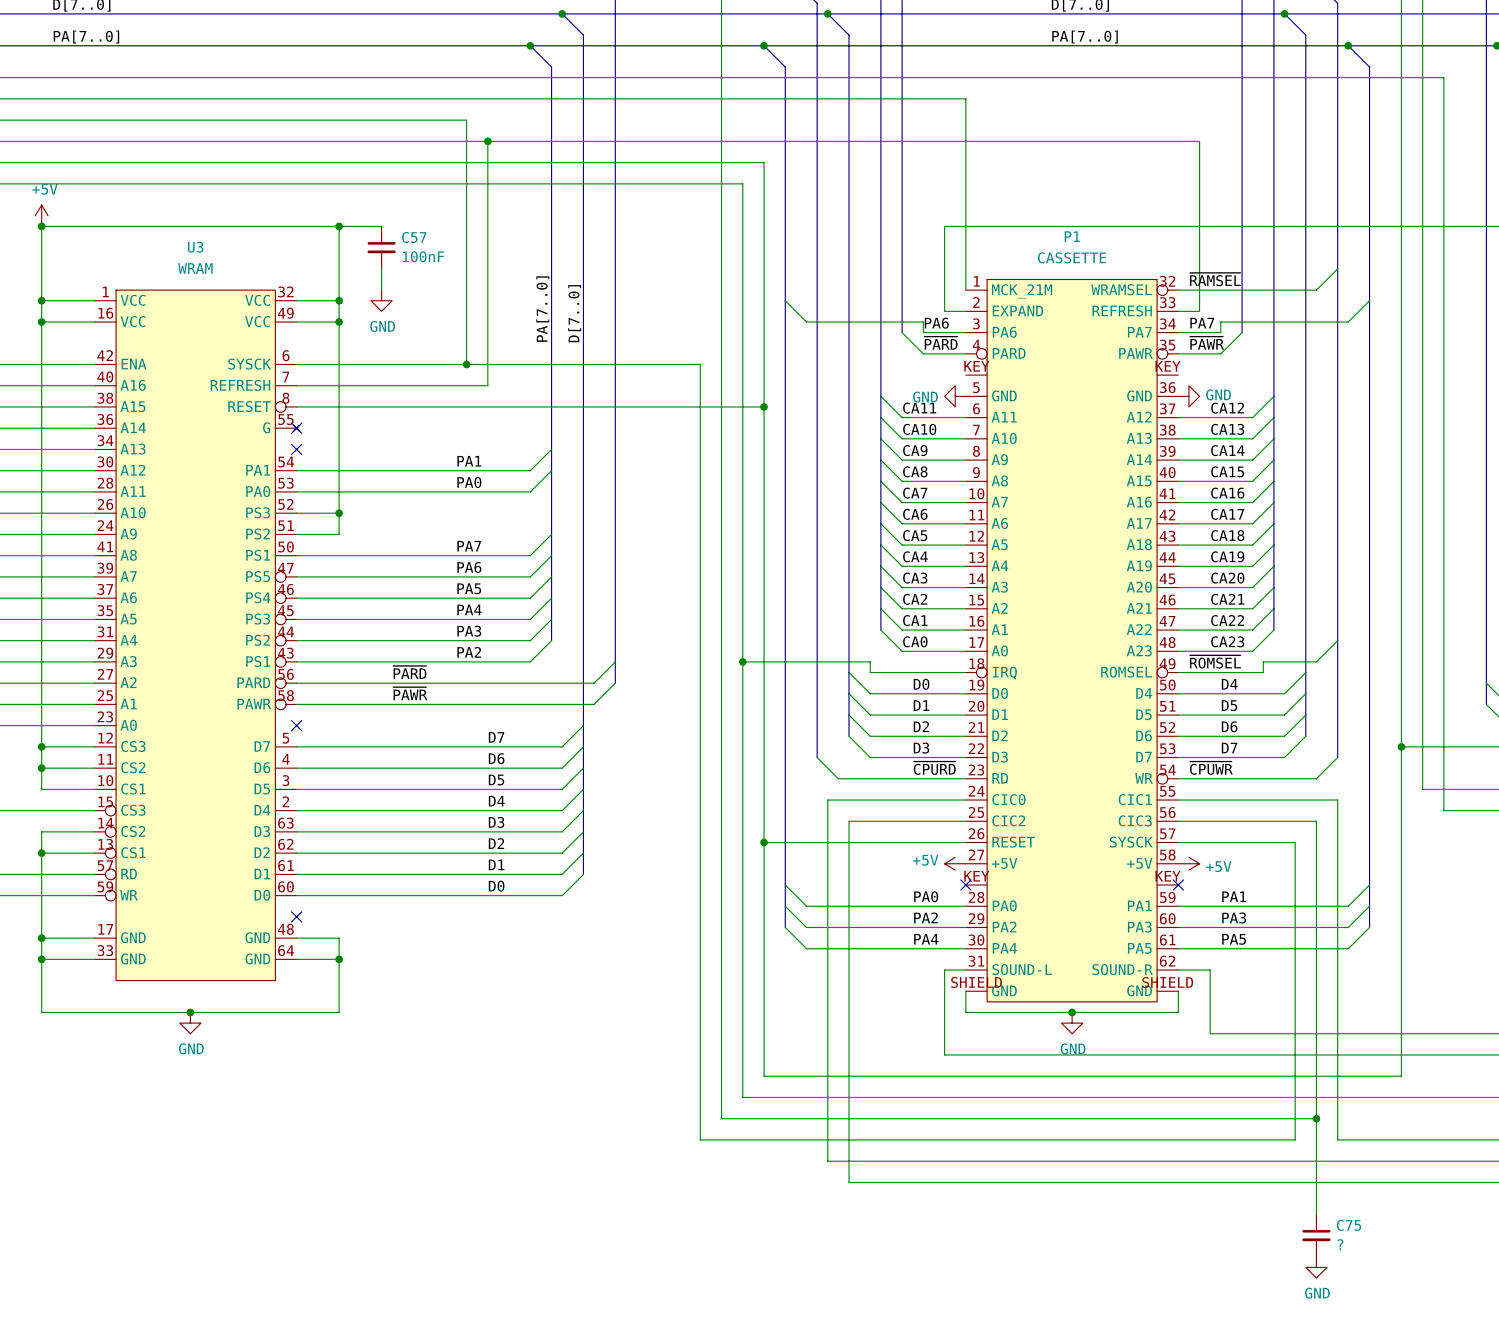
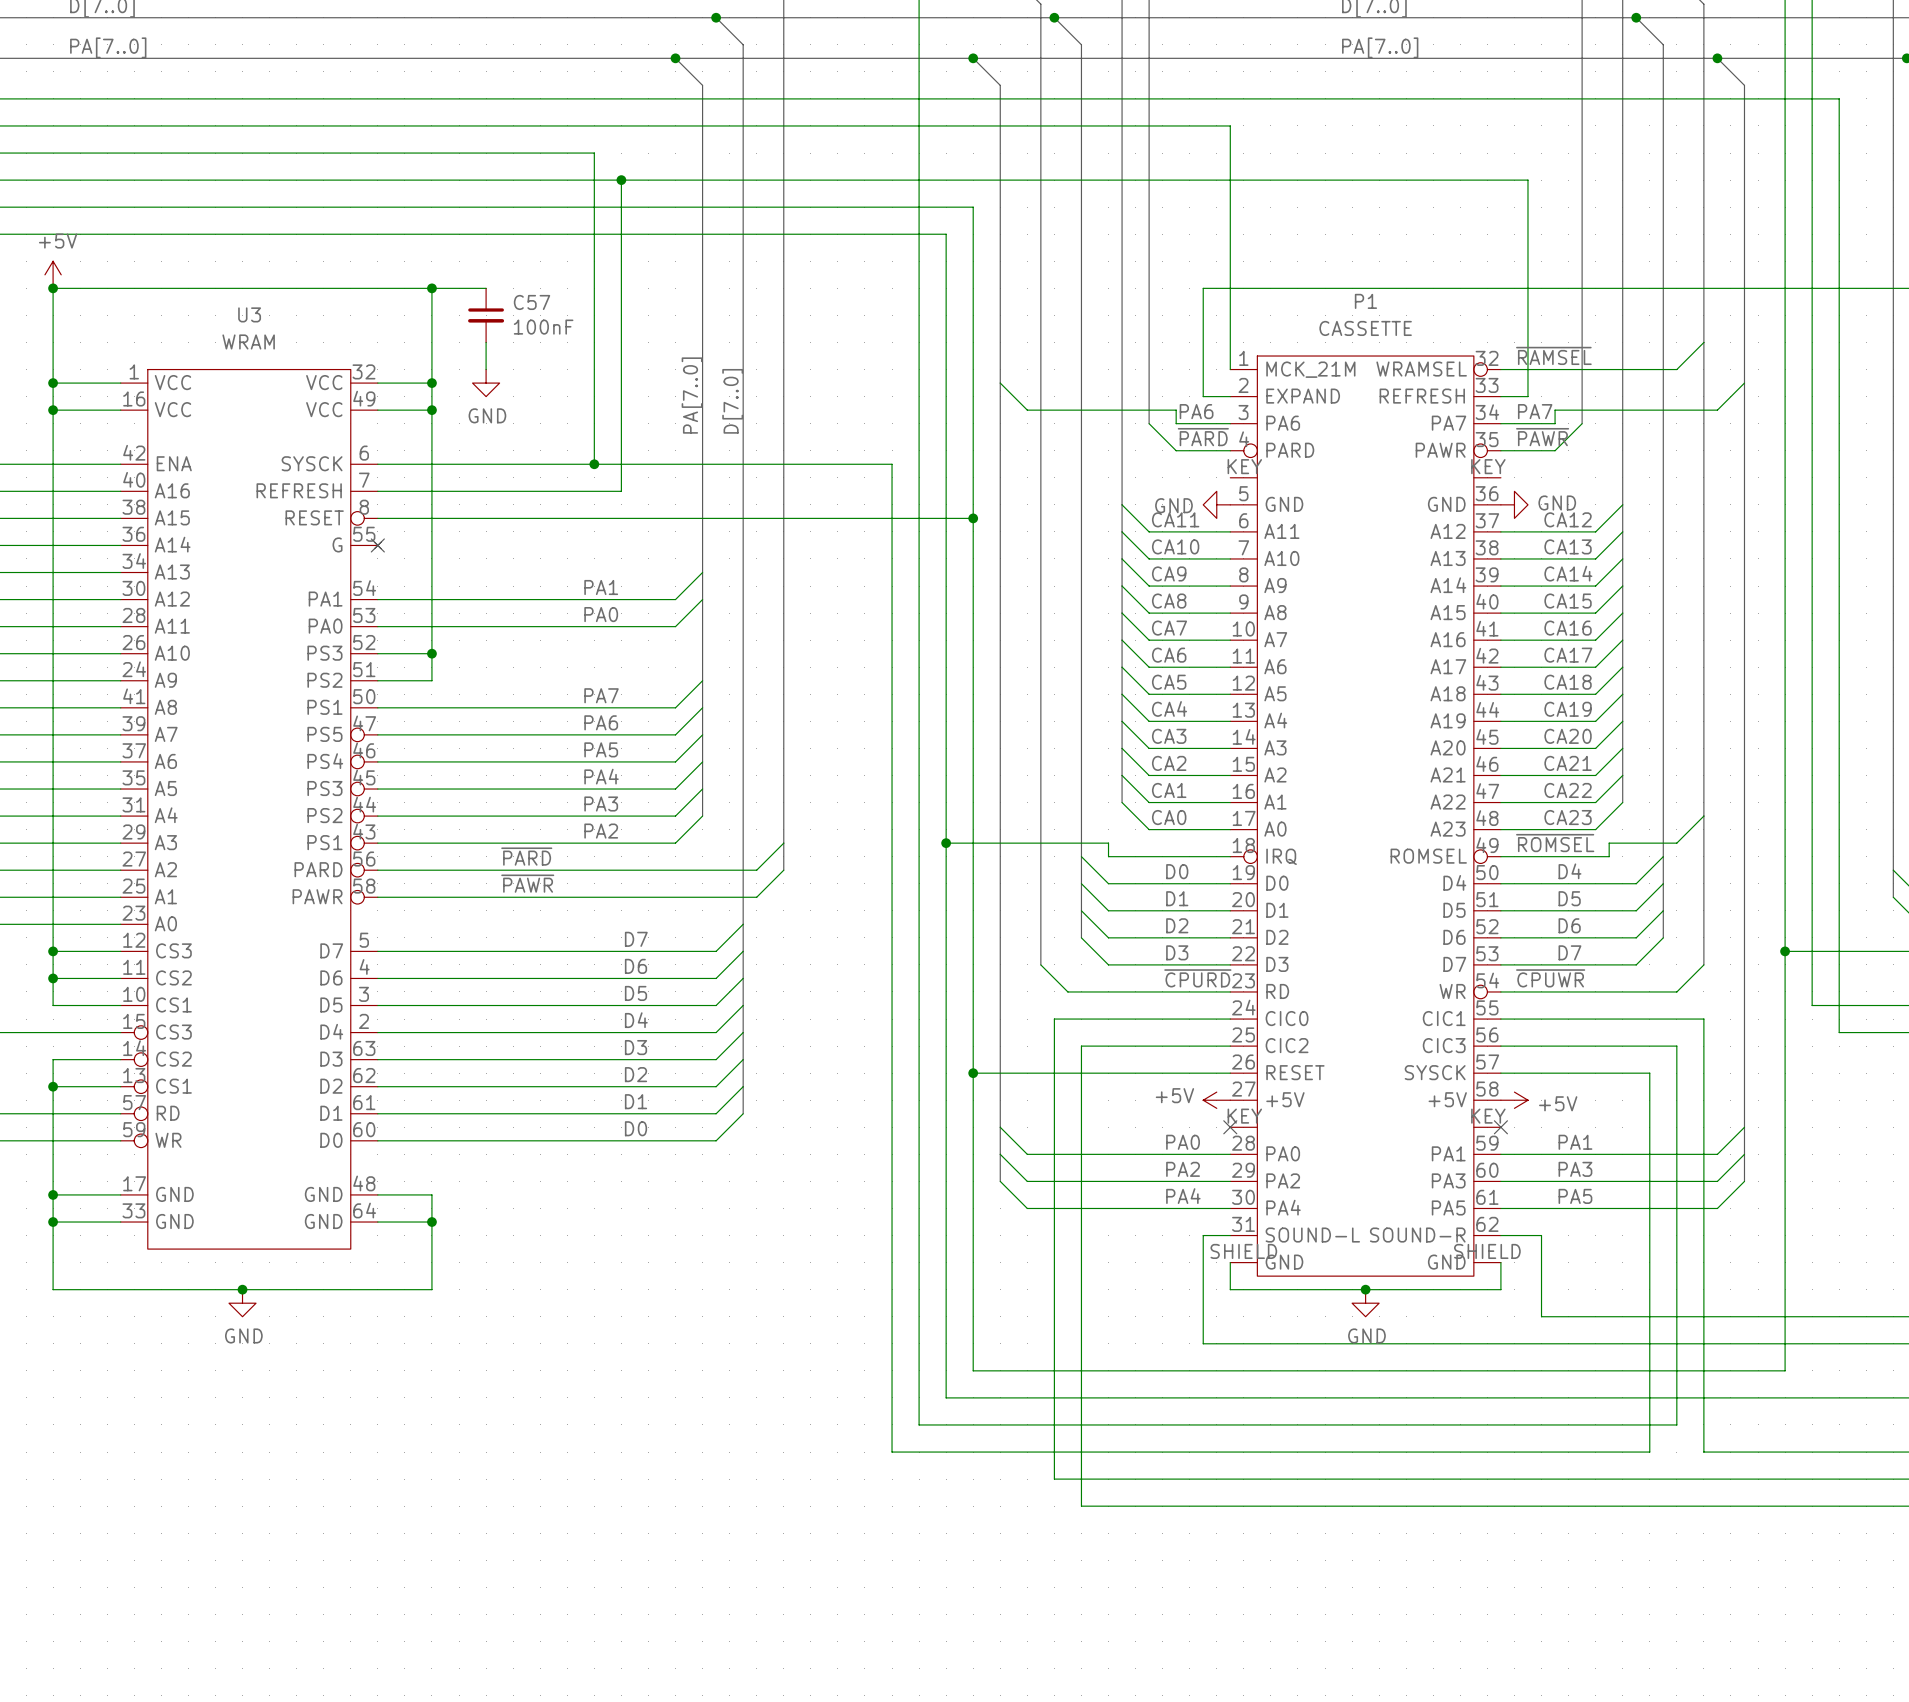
no-connect mark: (296, 449) -> none
no-connect mark: (296, 725) -> none
no-connect mark: (296, 916) -> none
wire: (1316, 1118) (1316, 1214) -> none
junction: (1316, 1118) -> none
C75: ? (1316, 1235) -> none
power symbol: GND (1316, 1267) -> none

